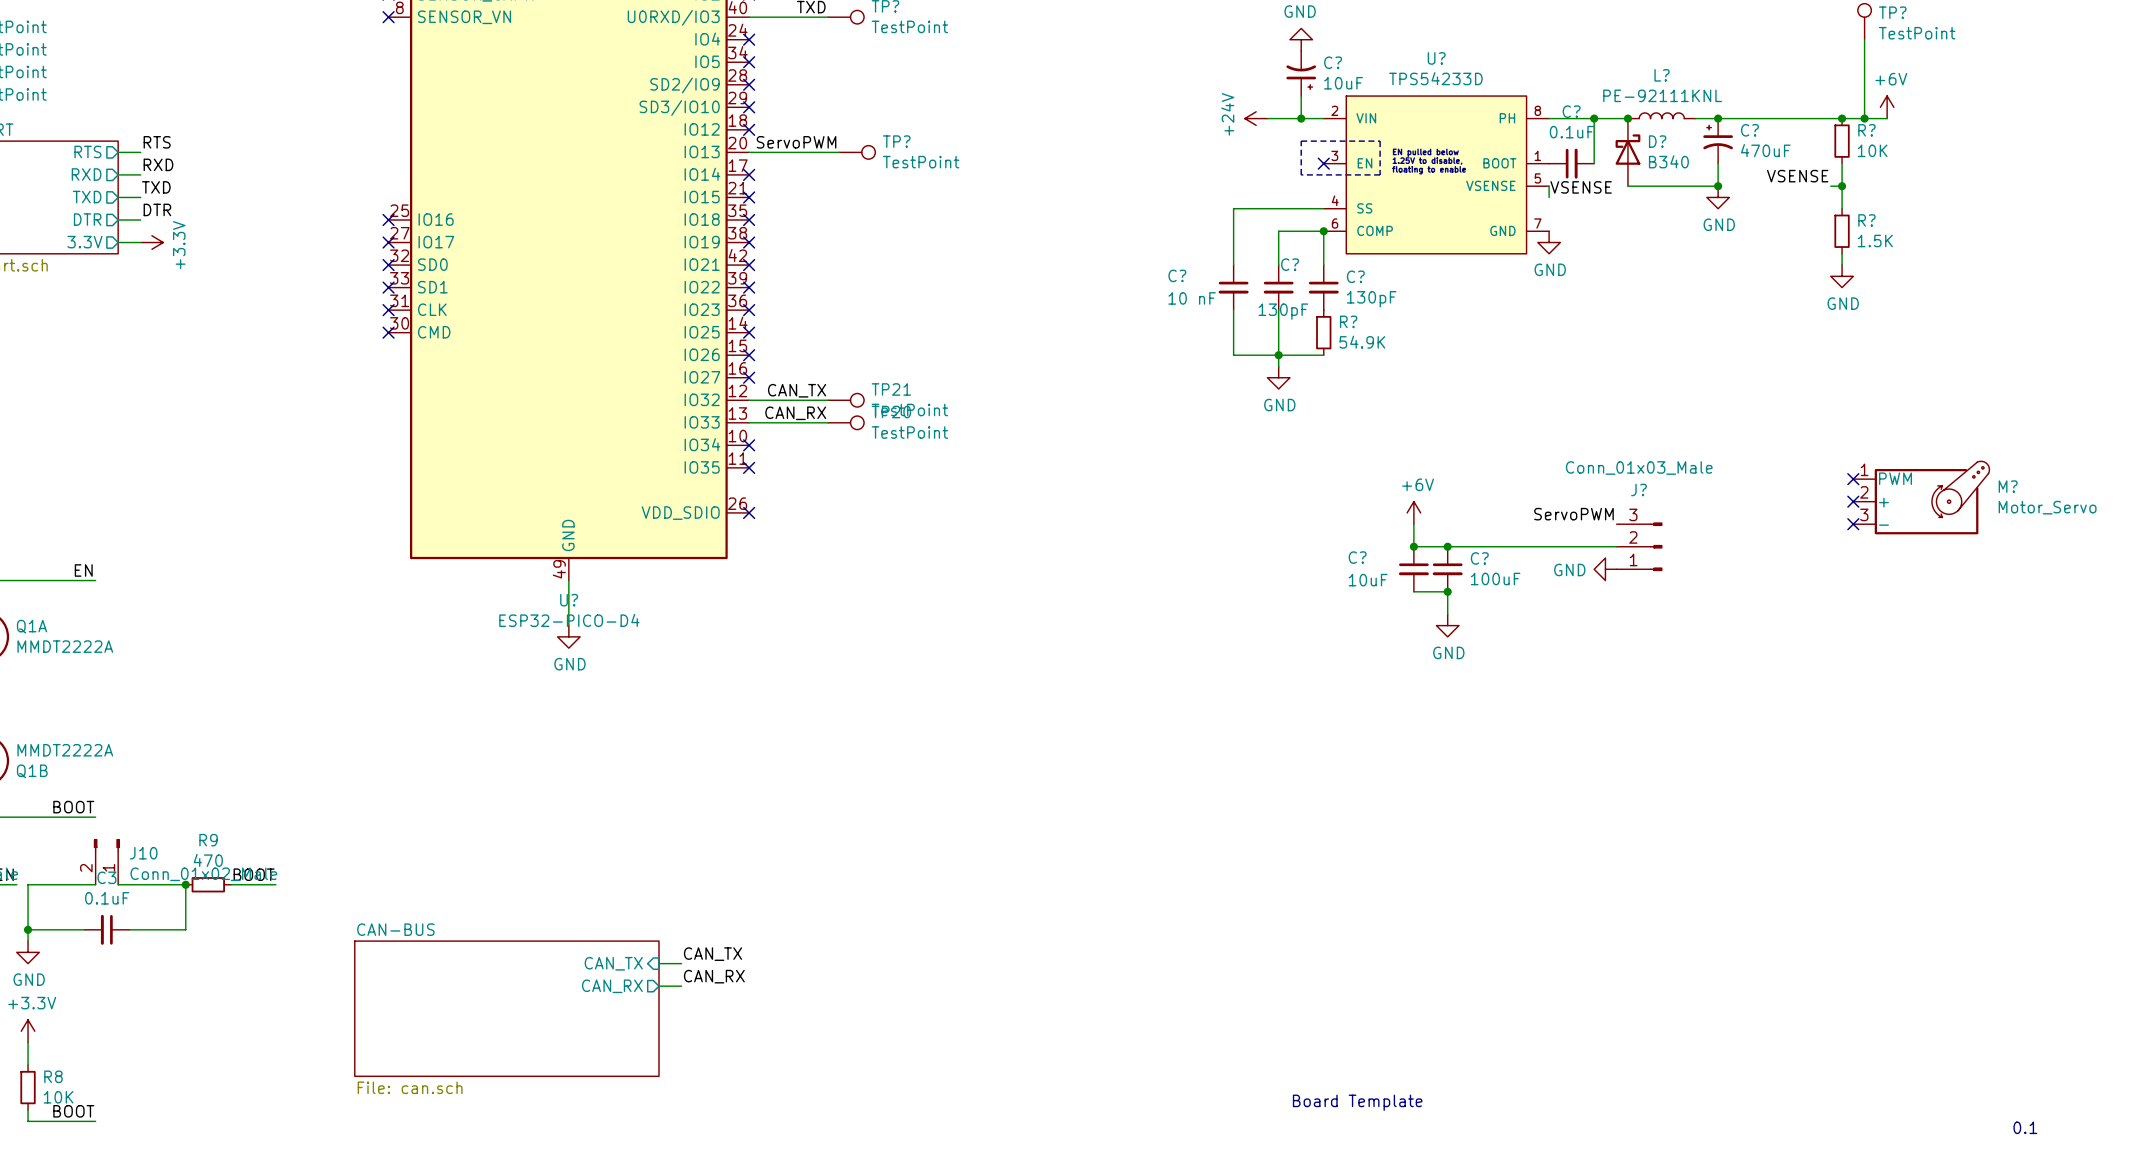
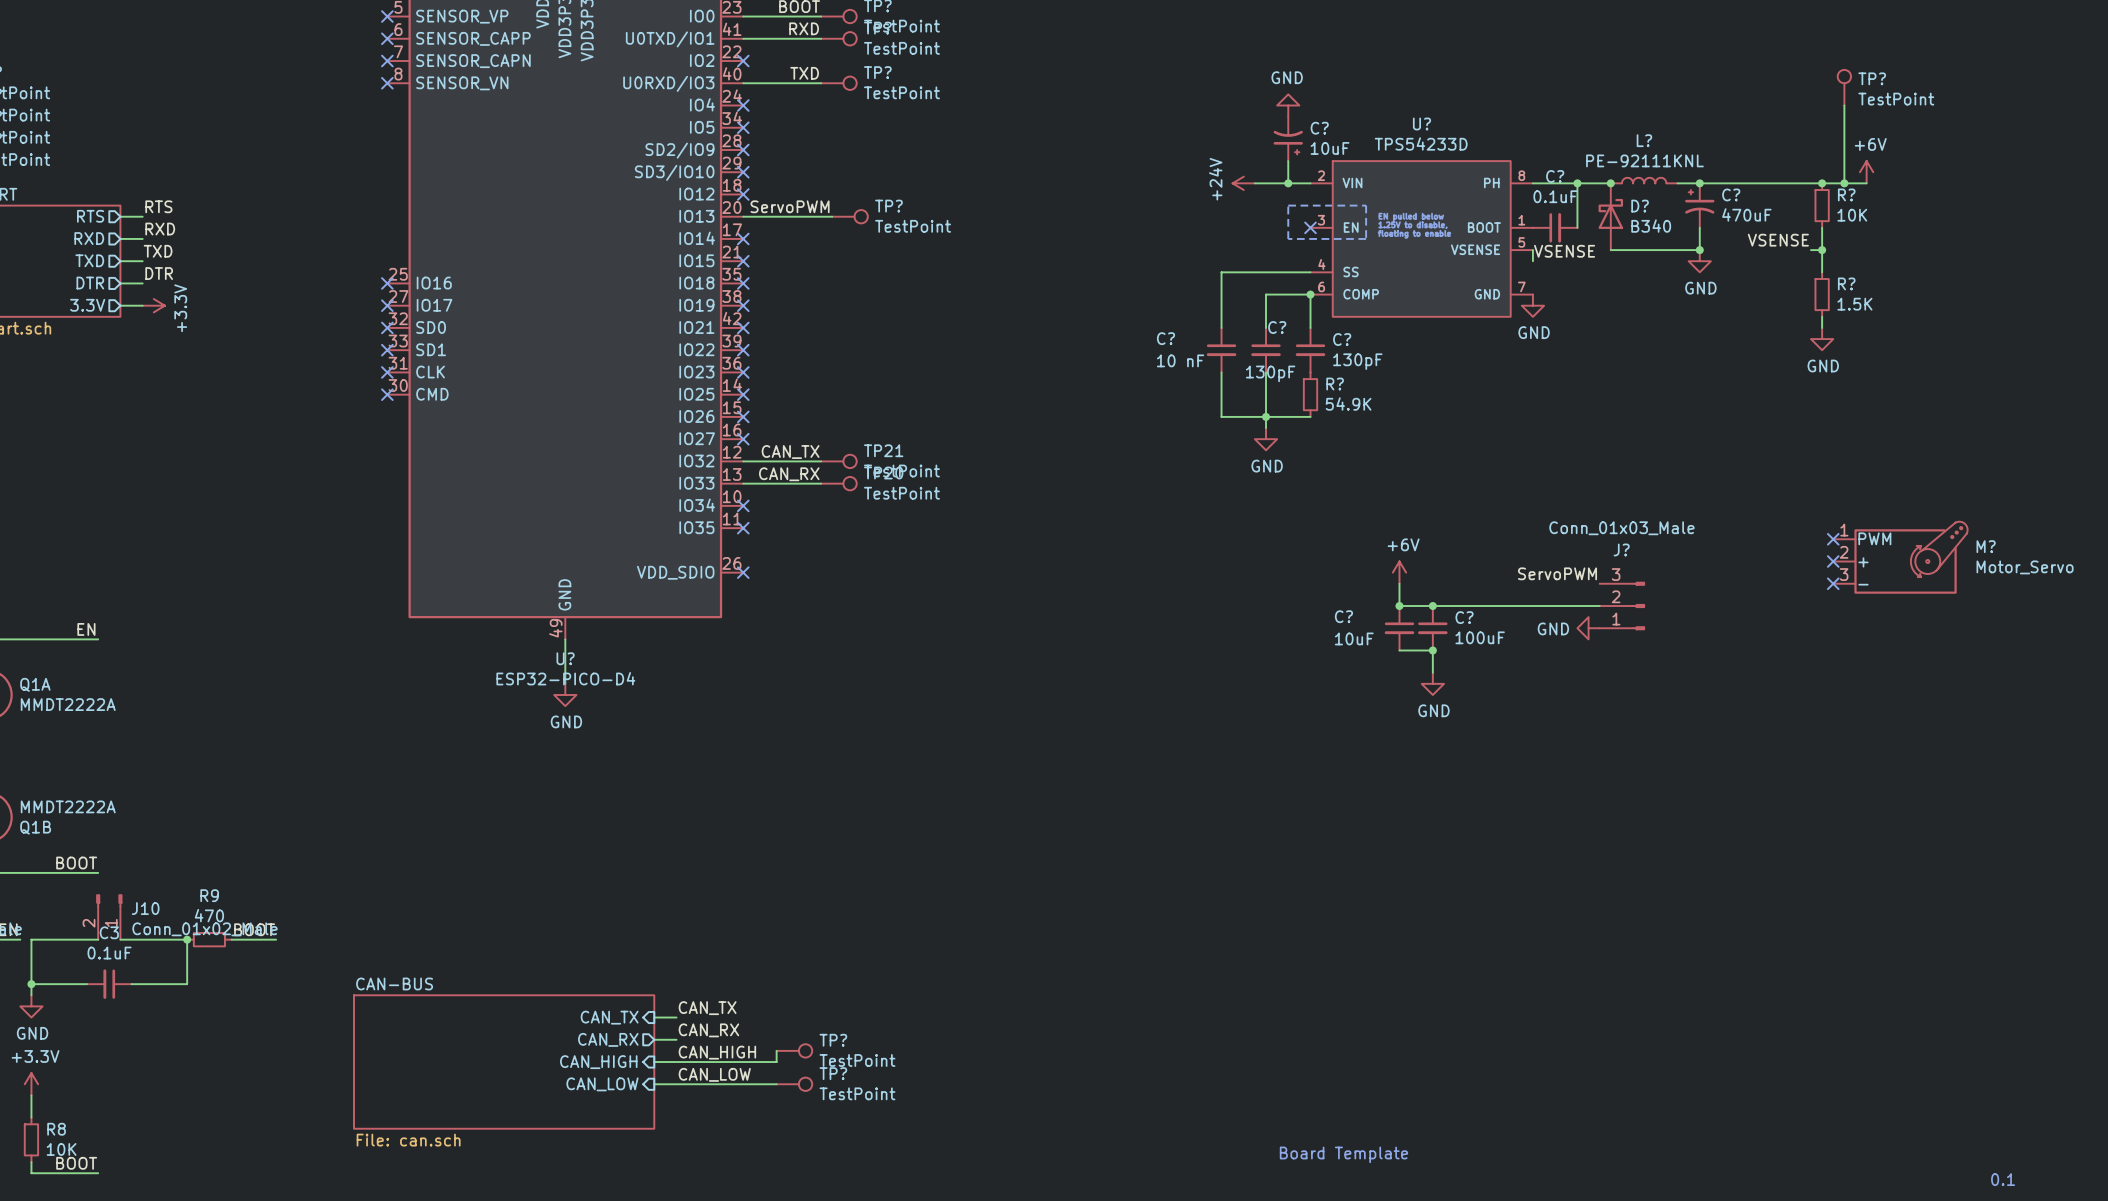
wire: none -> (776, 1050) (776, 1062) (654, 1062)
TP?: none -> TestPoint (794, 1050)
label: none -> CAN_HIGH (717, 1052)
sheet pin: none -> CAN_HIGH (598, 1062)
label: none -> CAN_LOW (714, 1074)
sheet pin: none -> CAN_LOW (602, 1084)
wire: none -> (654, 1084) (776, 1084)
TP?: none -> TestPoint (794, 1084)

